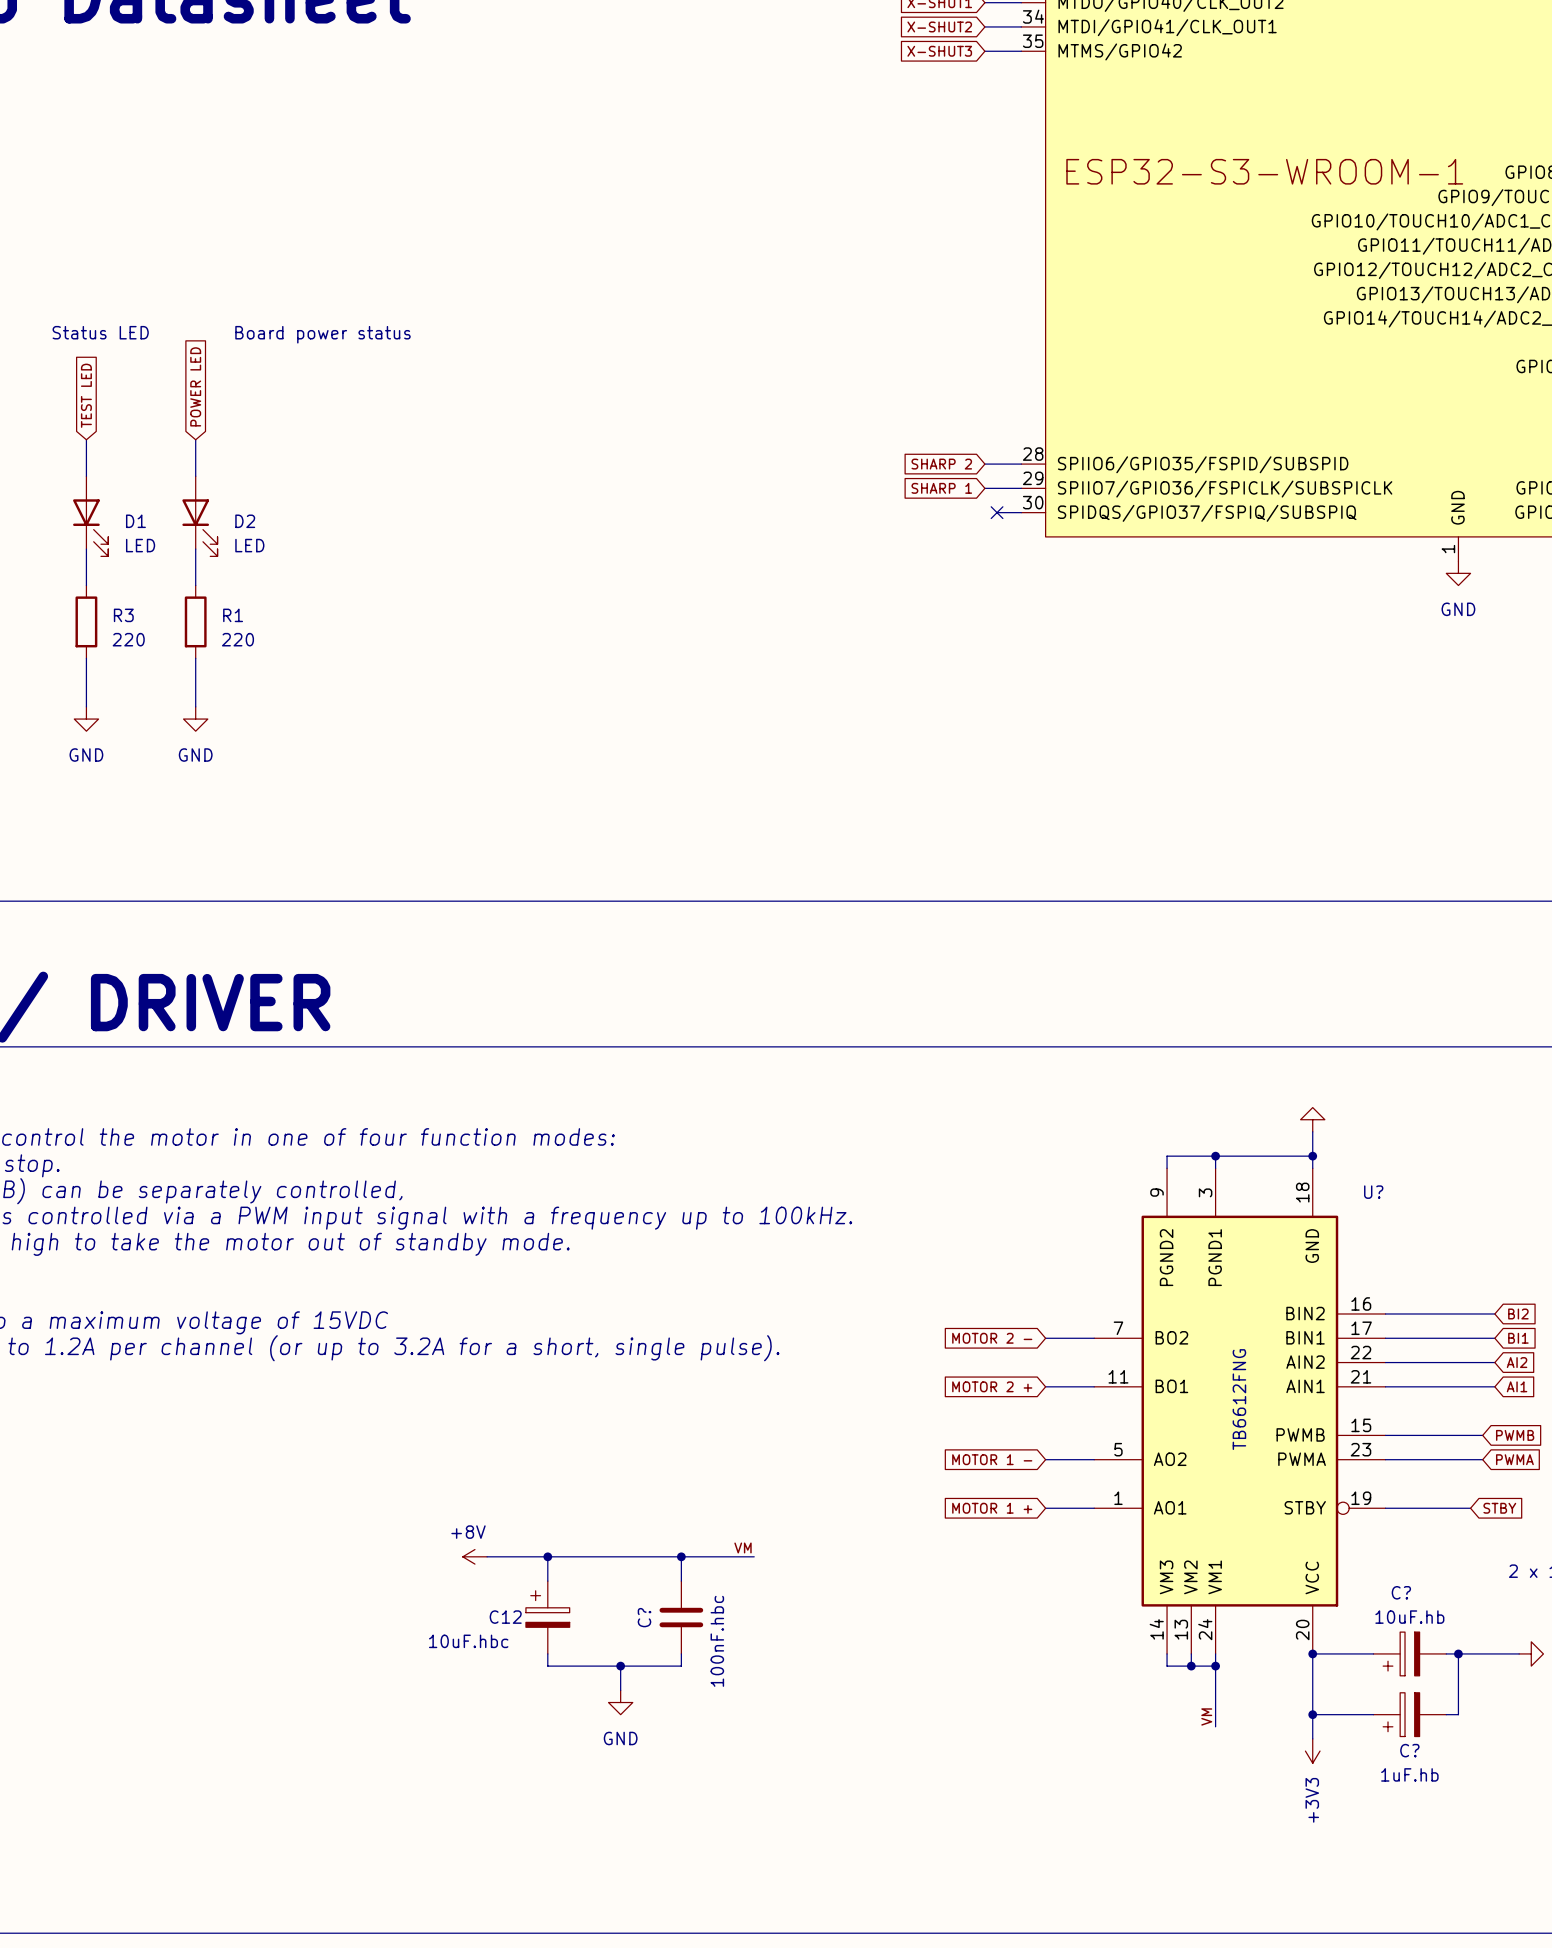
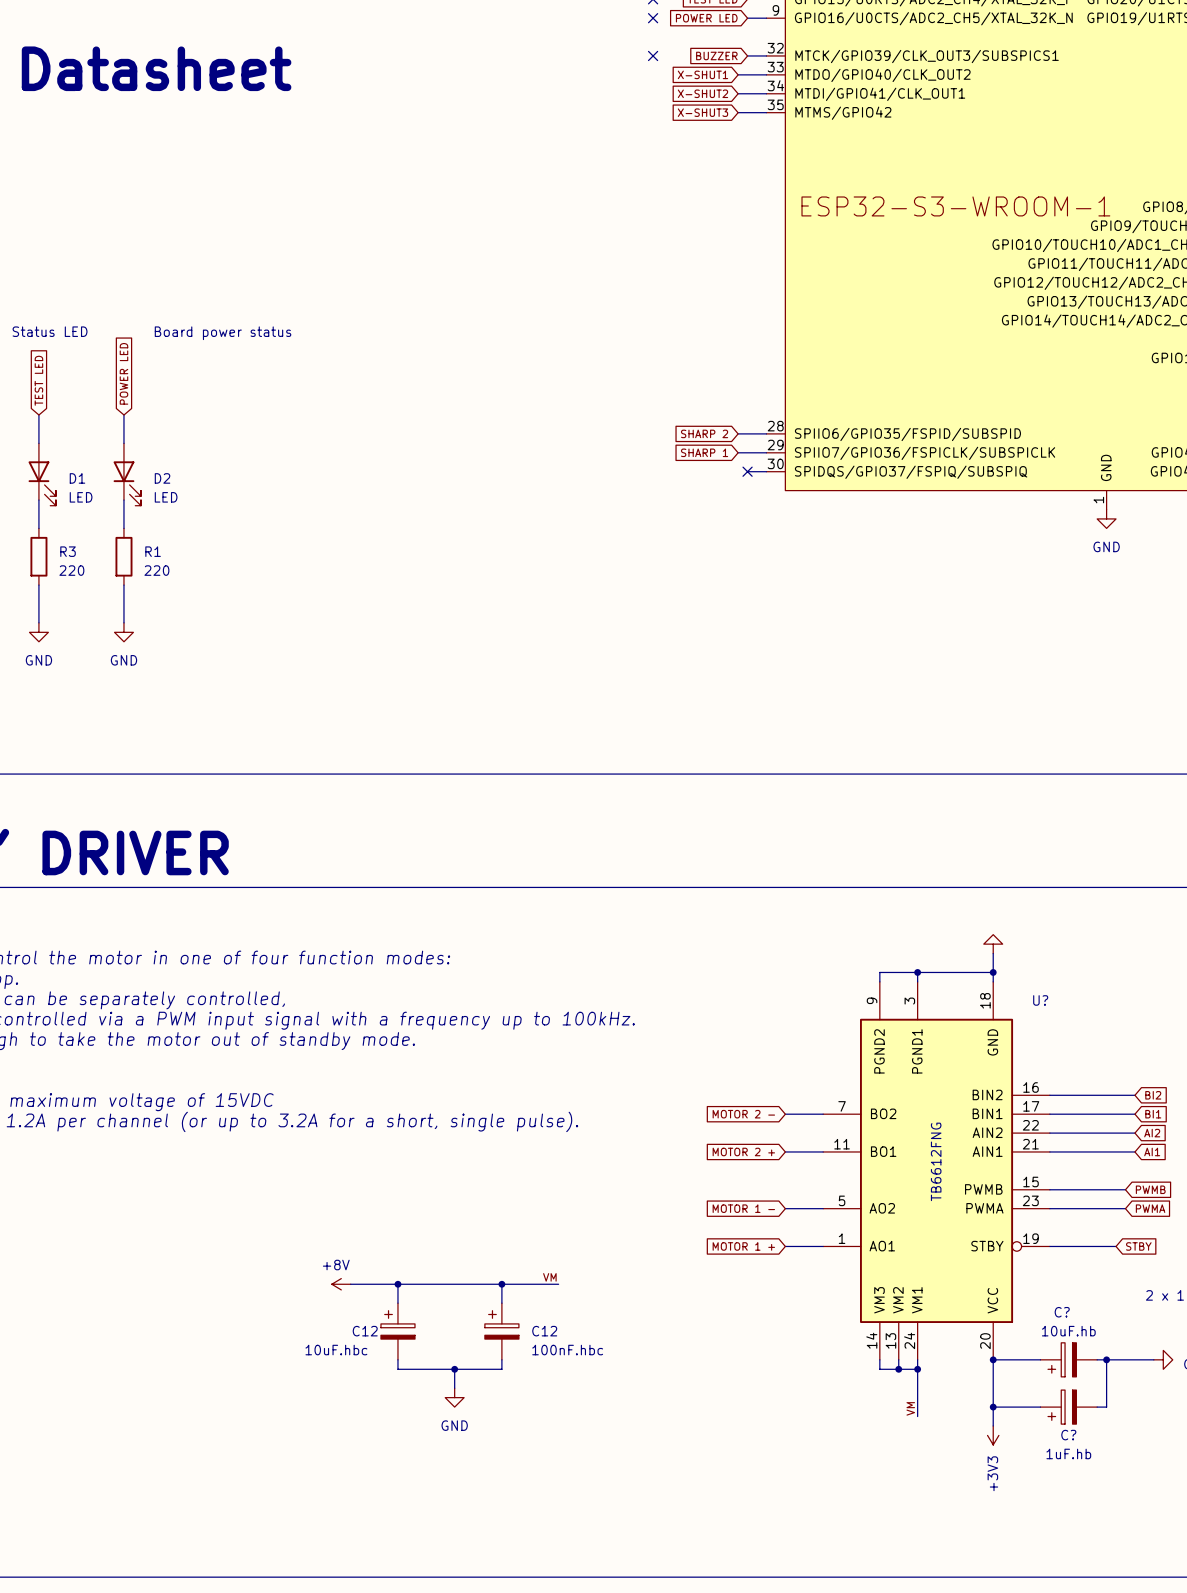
C?: 100nF.hbc (681, 1617) -> none
C12: none -> 100nF.hbc (501, 1331)

